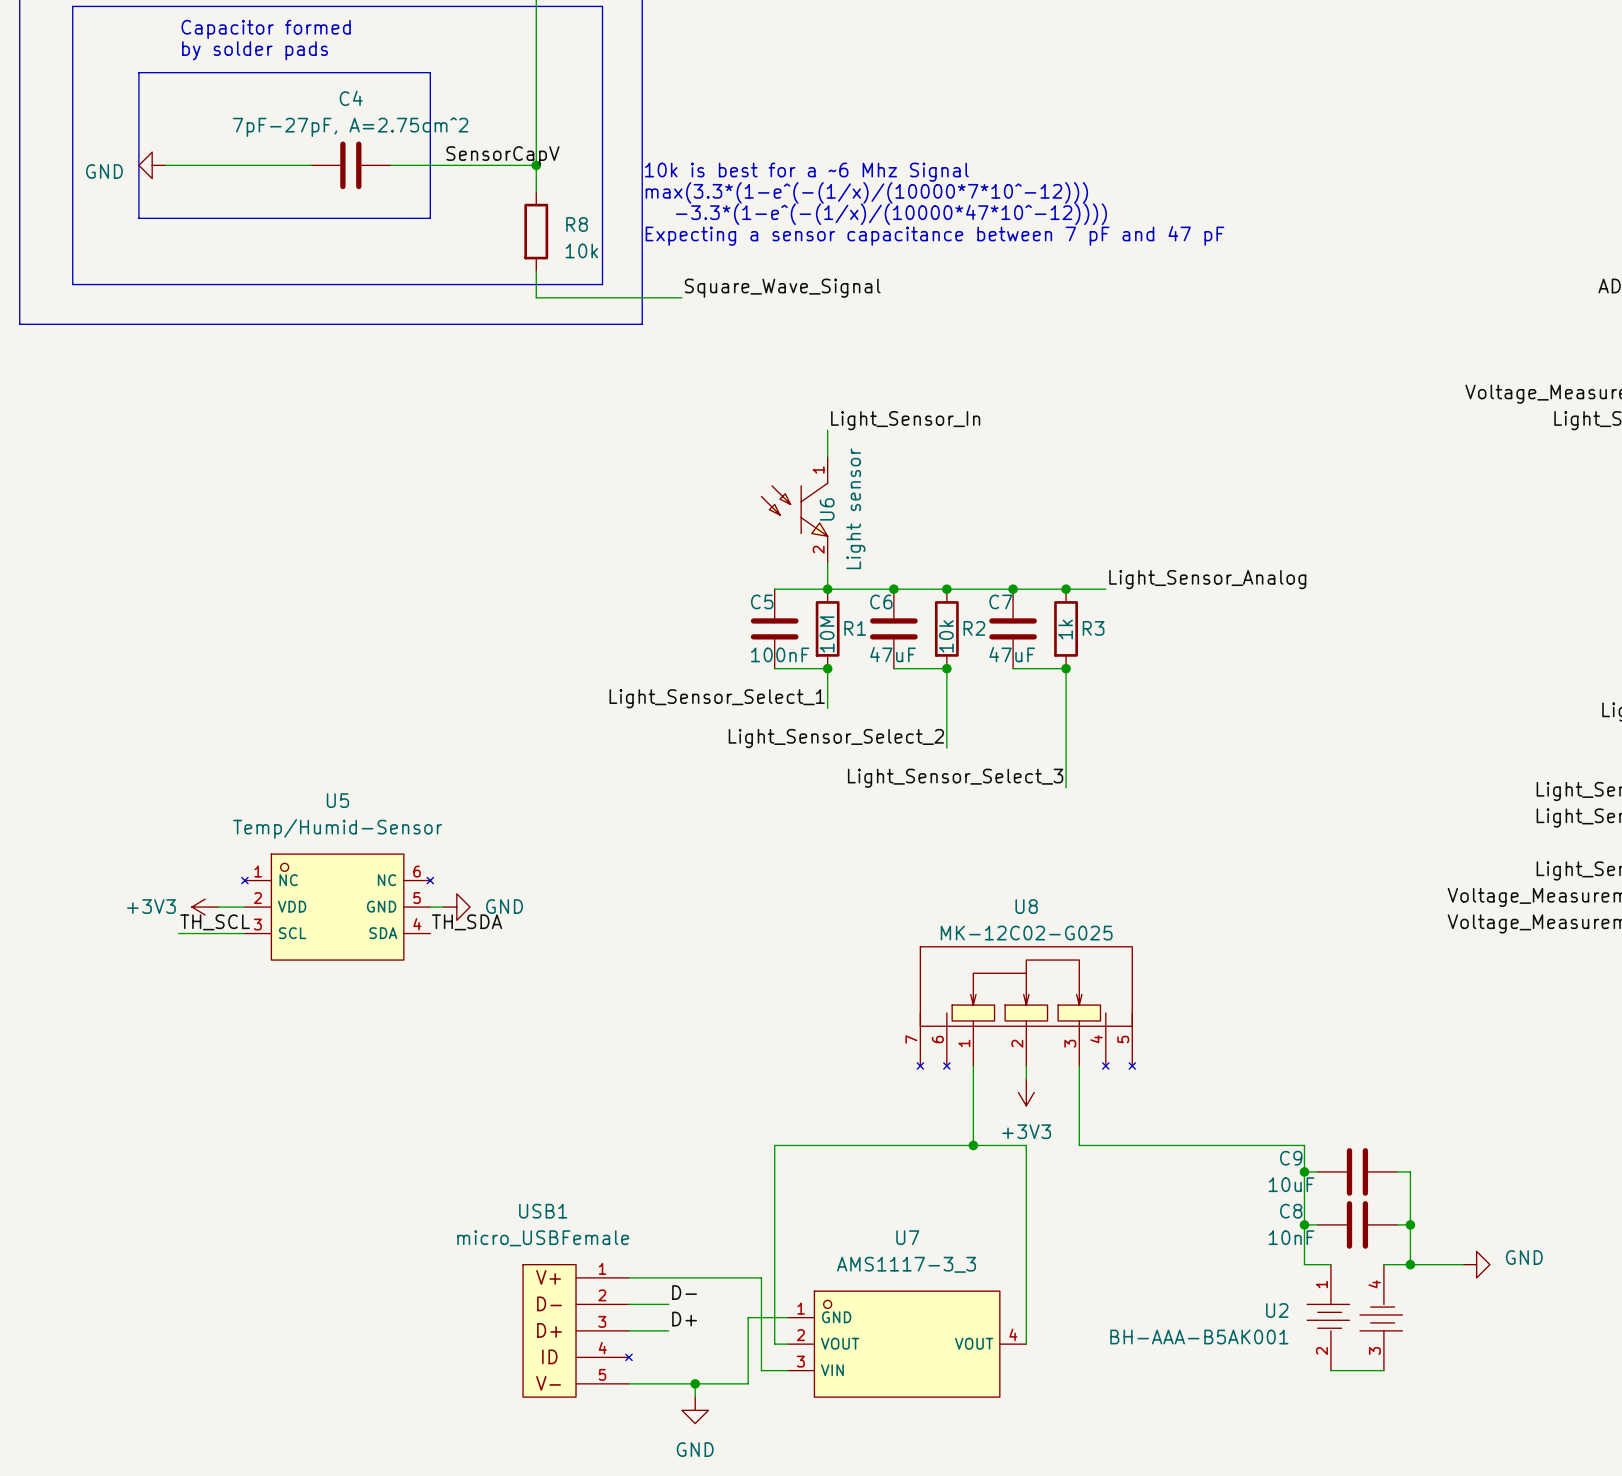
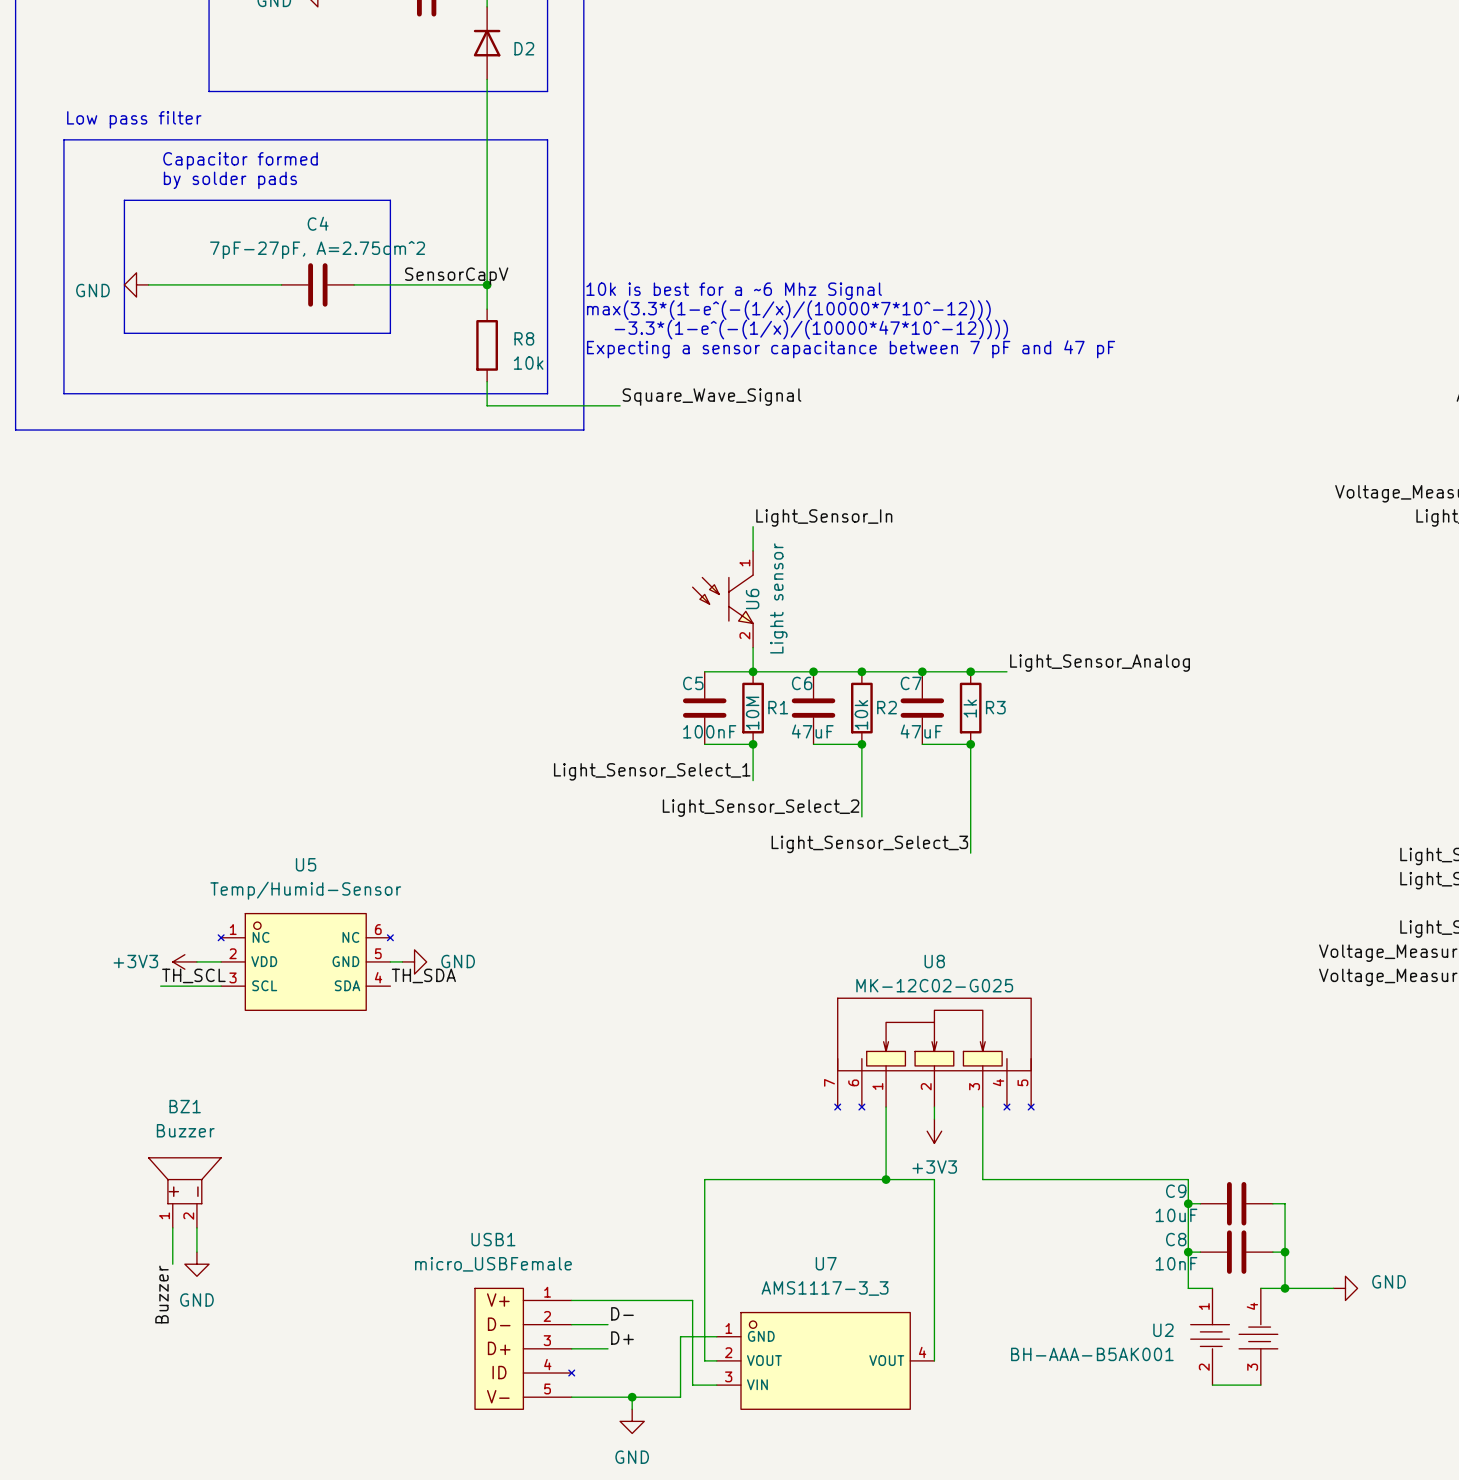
BZ1: none -> Buzzer (184, 1192)
wire: none -> (172, 1227) (172, 1264)
wire: none -> (196, 1227) (196, 1252)
power symbol: none -> GND (196, 1264)
label: none -> Buzzer (161, 1294)

